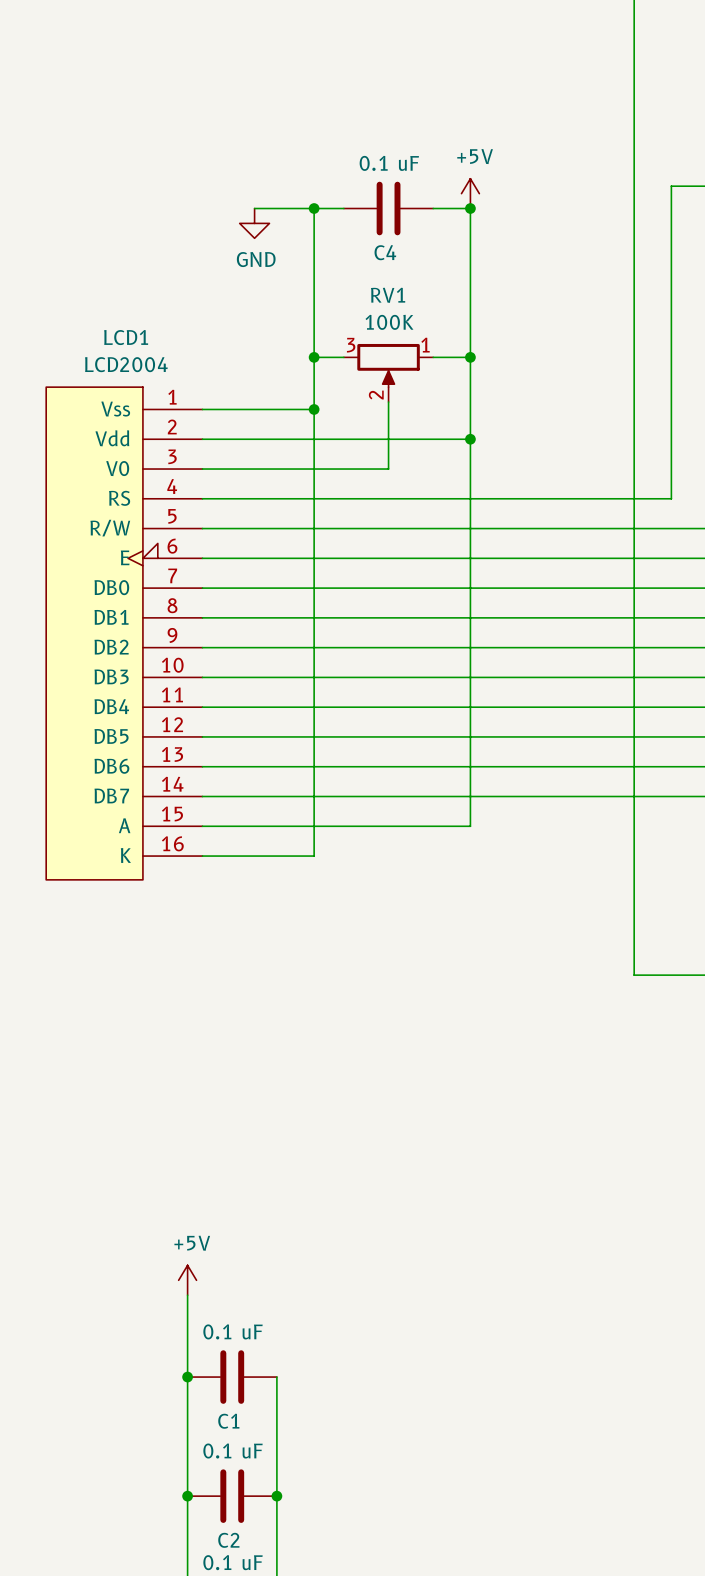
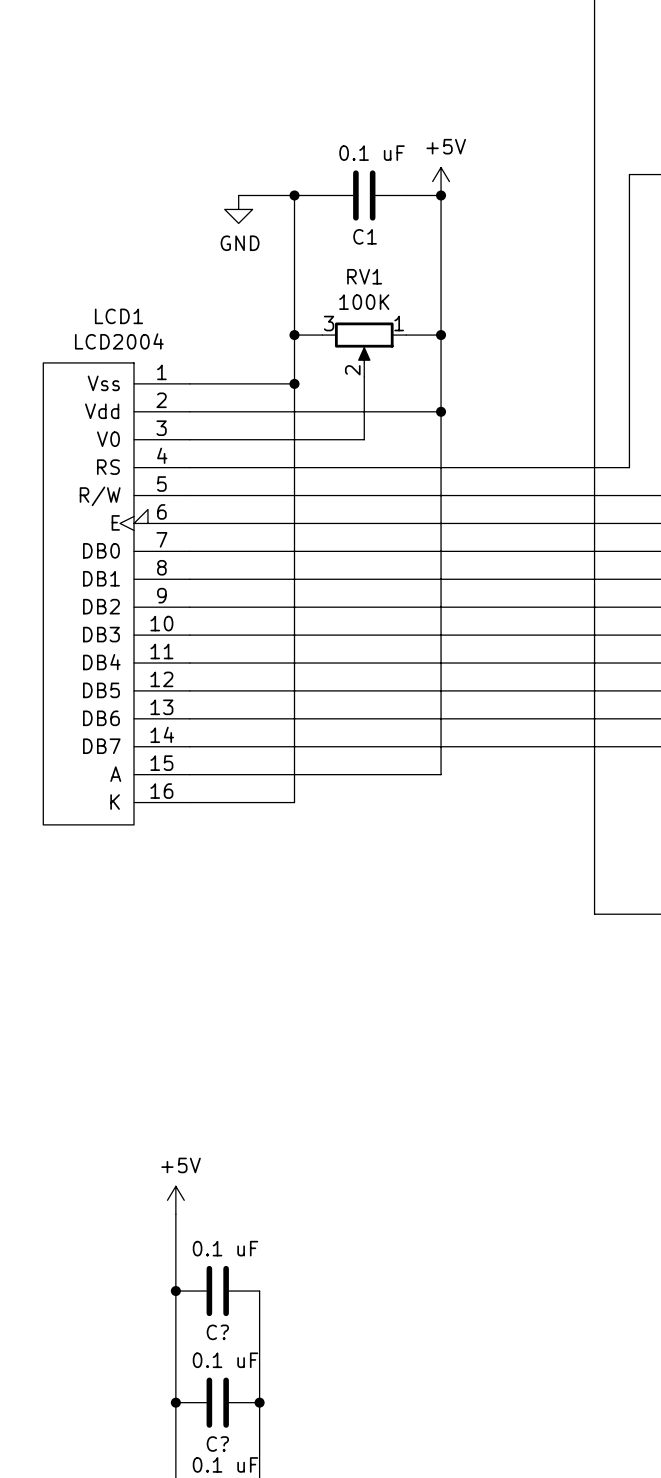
C4 name: C4 (385, 252) -> C1 (365, 236)
C1 name: C1 (228, 1421) -> C? (217, 1332)
C2 name: C2 (228, 1540) -> C? (217, 1444)

